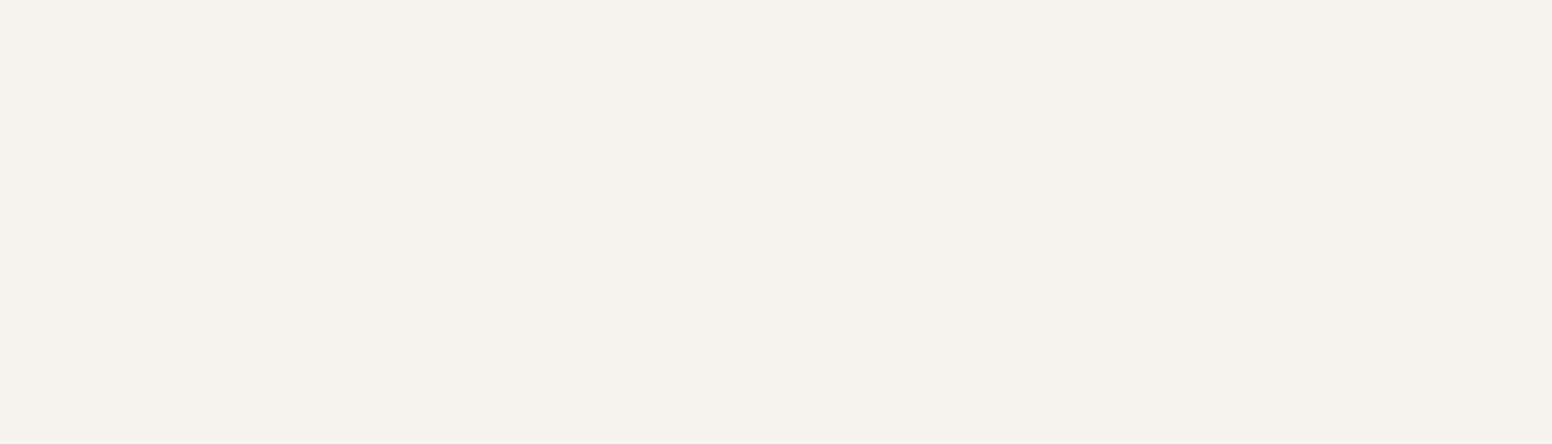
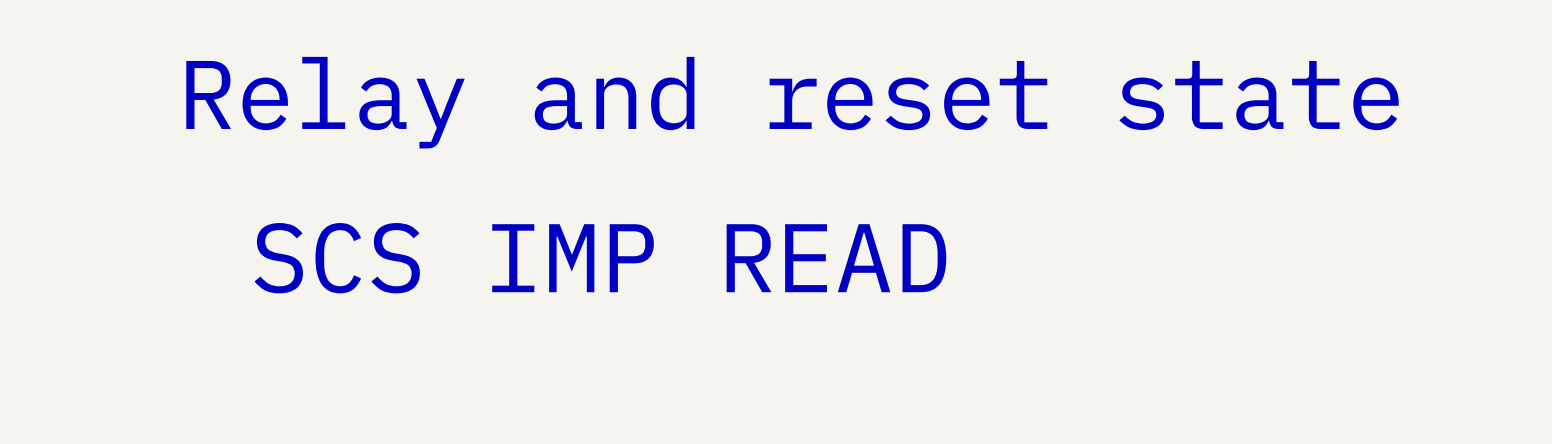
text: none -> Relay and reset state (792, 102)
text: none -> SCS IMP READ (600, 258)

